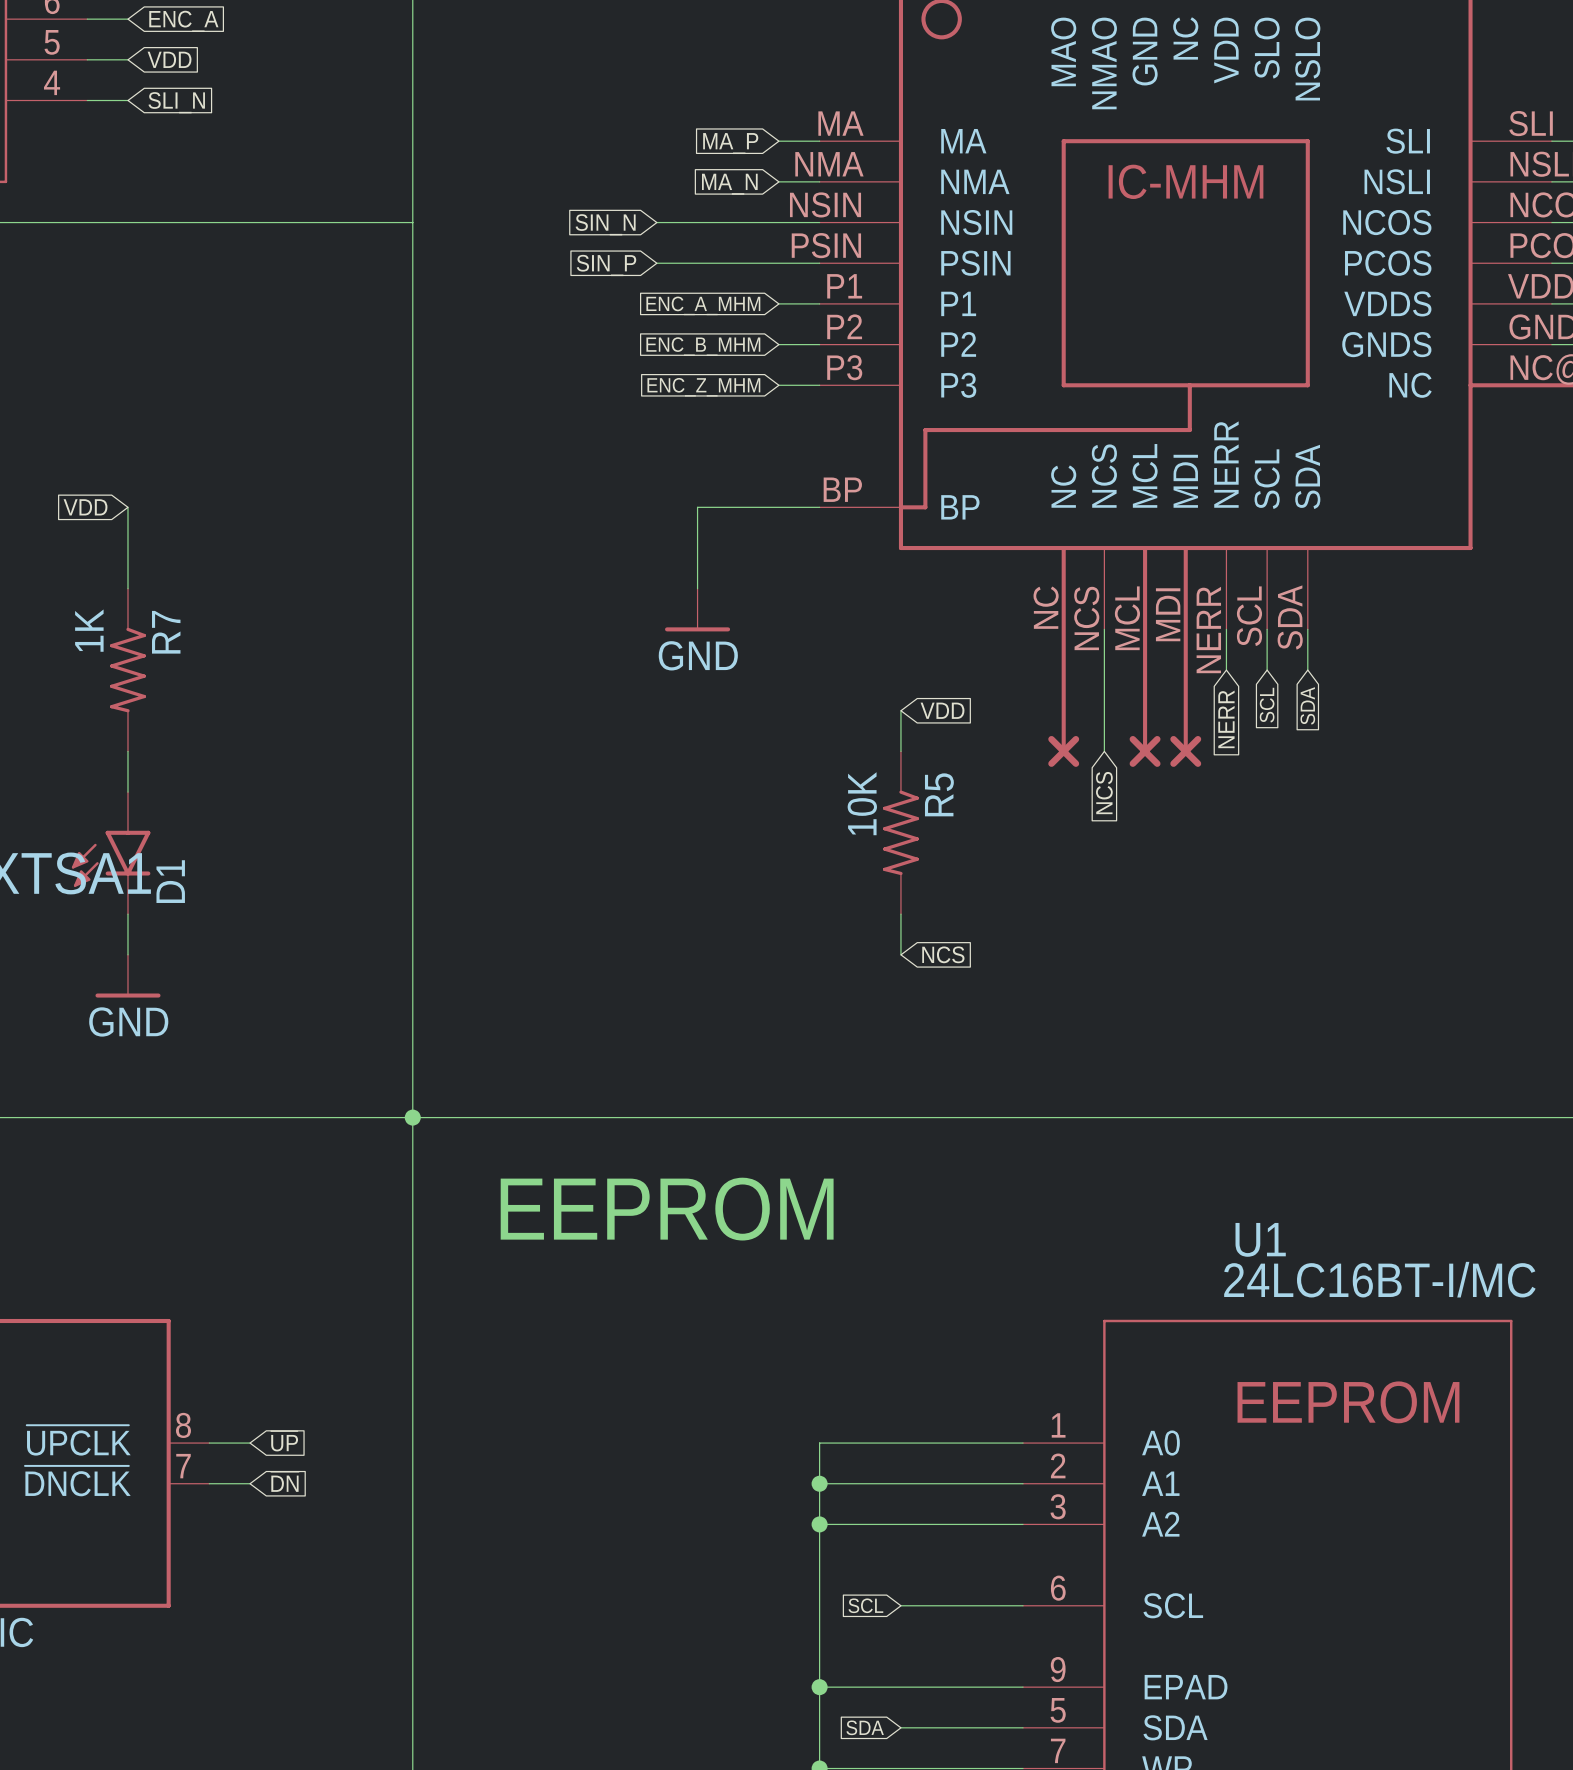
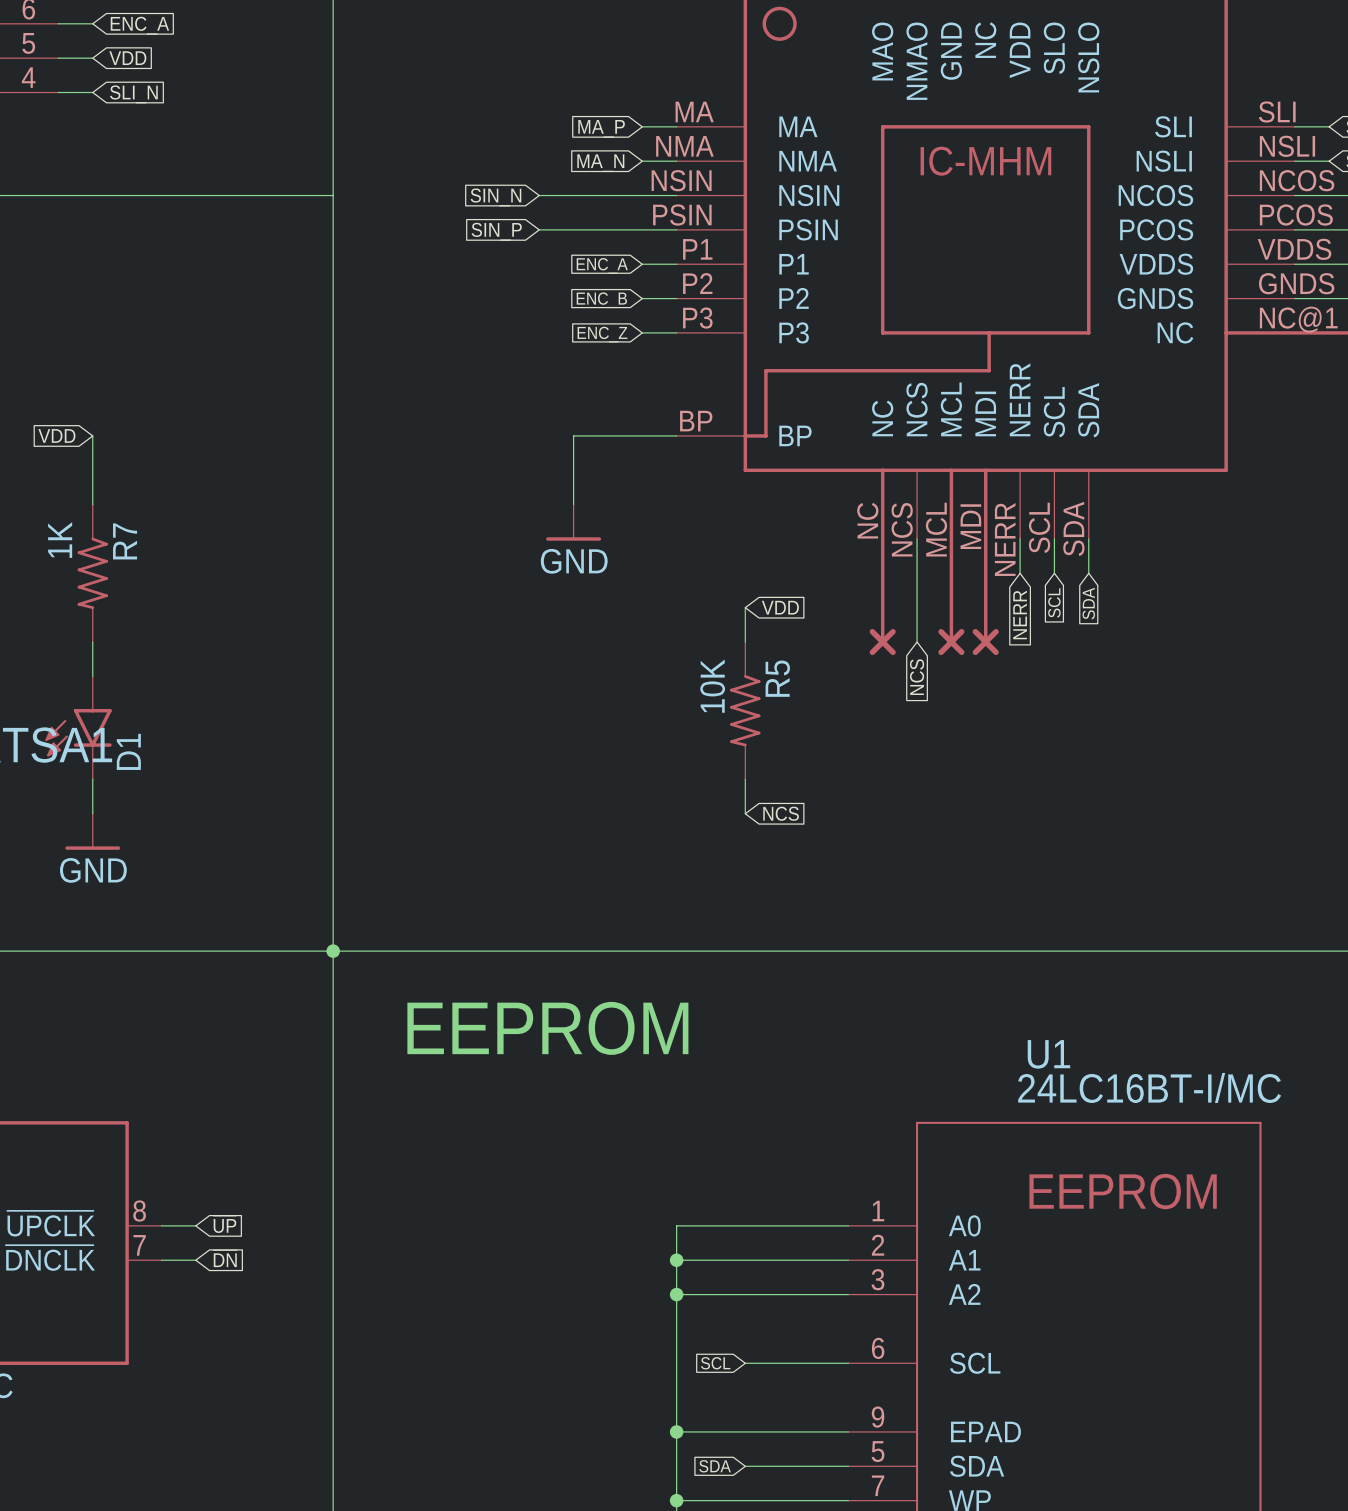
global label: ENC_A_MHM (703, 305) -> ENC_A (602, 265)
global label: ENC_B_MHM (703, 346) -> ENC_B (601, 300)
global label: ENC_Z_MHM (703, 387) -> ENC_Z (602, 334)

